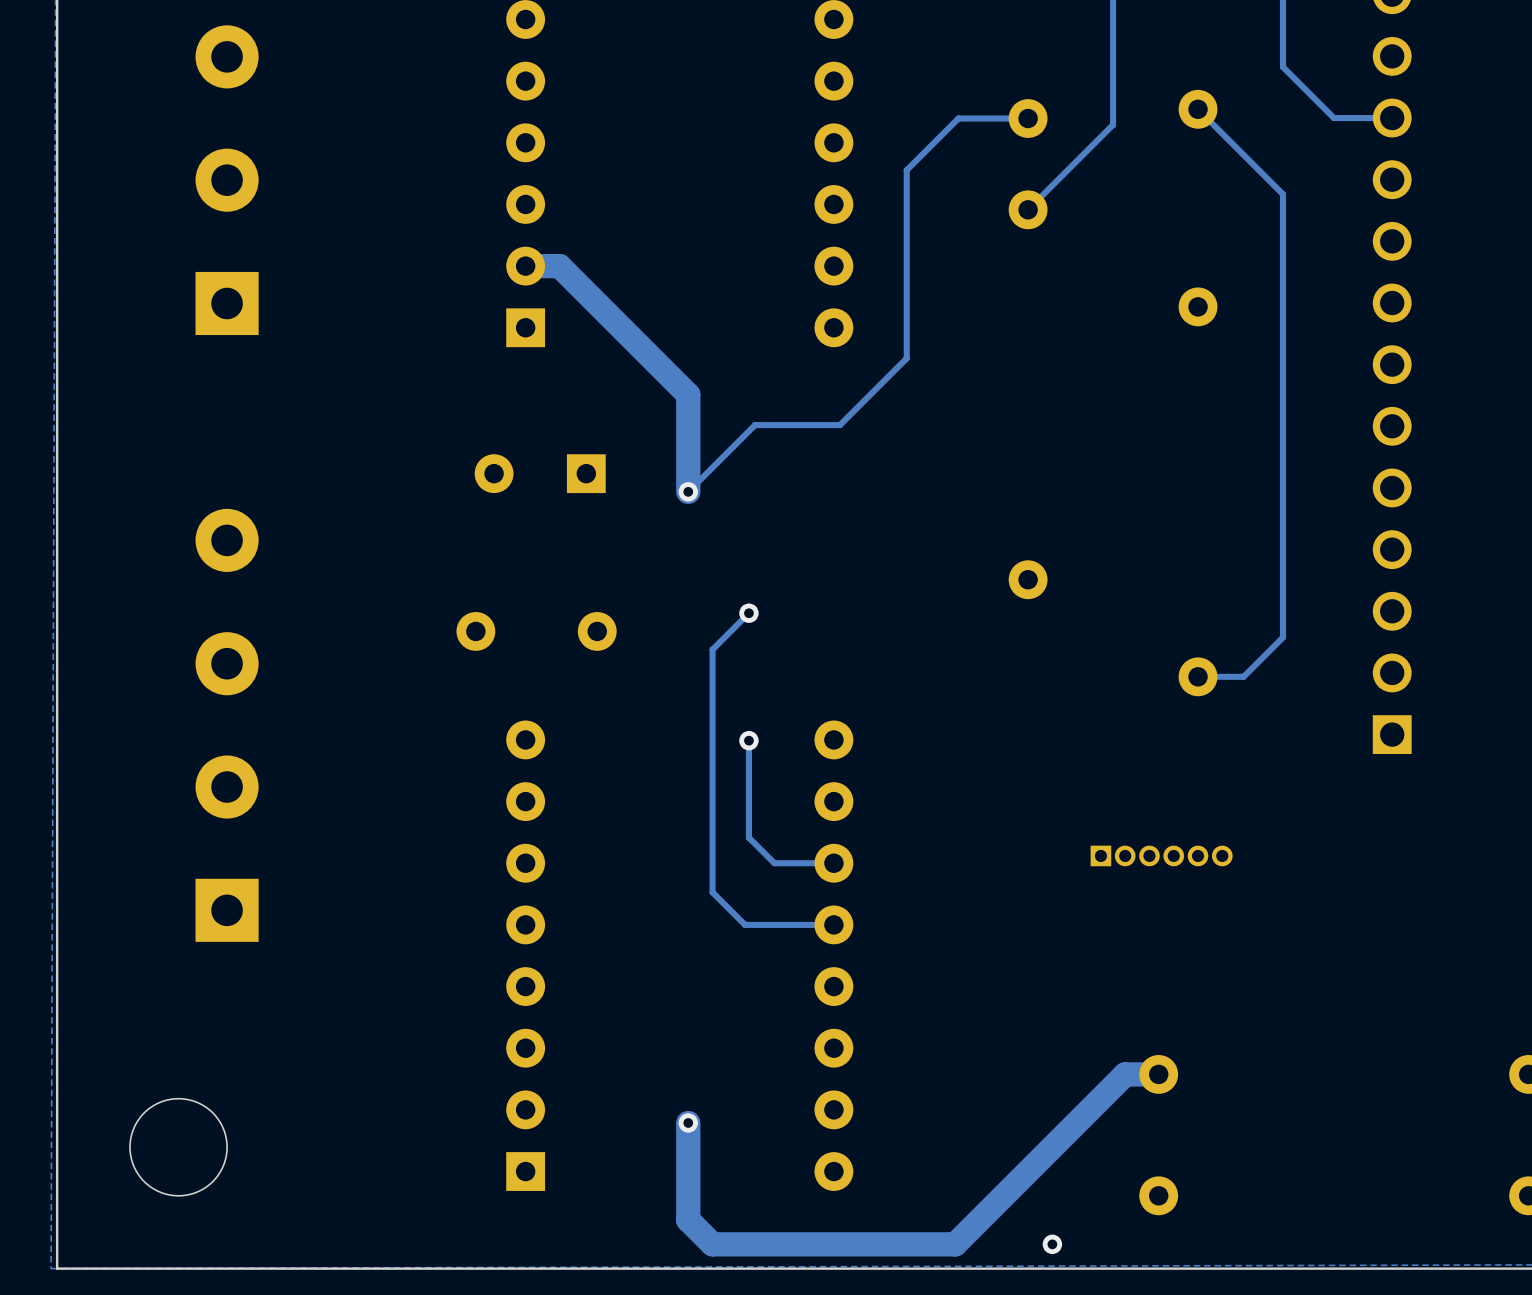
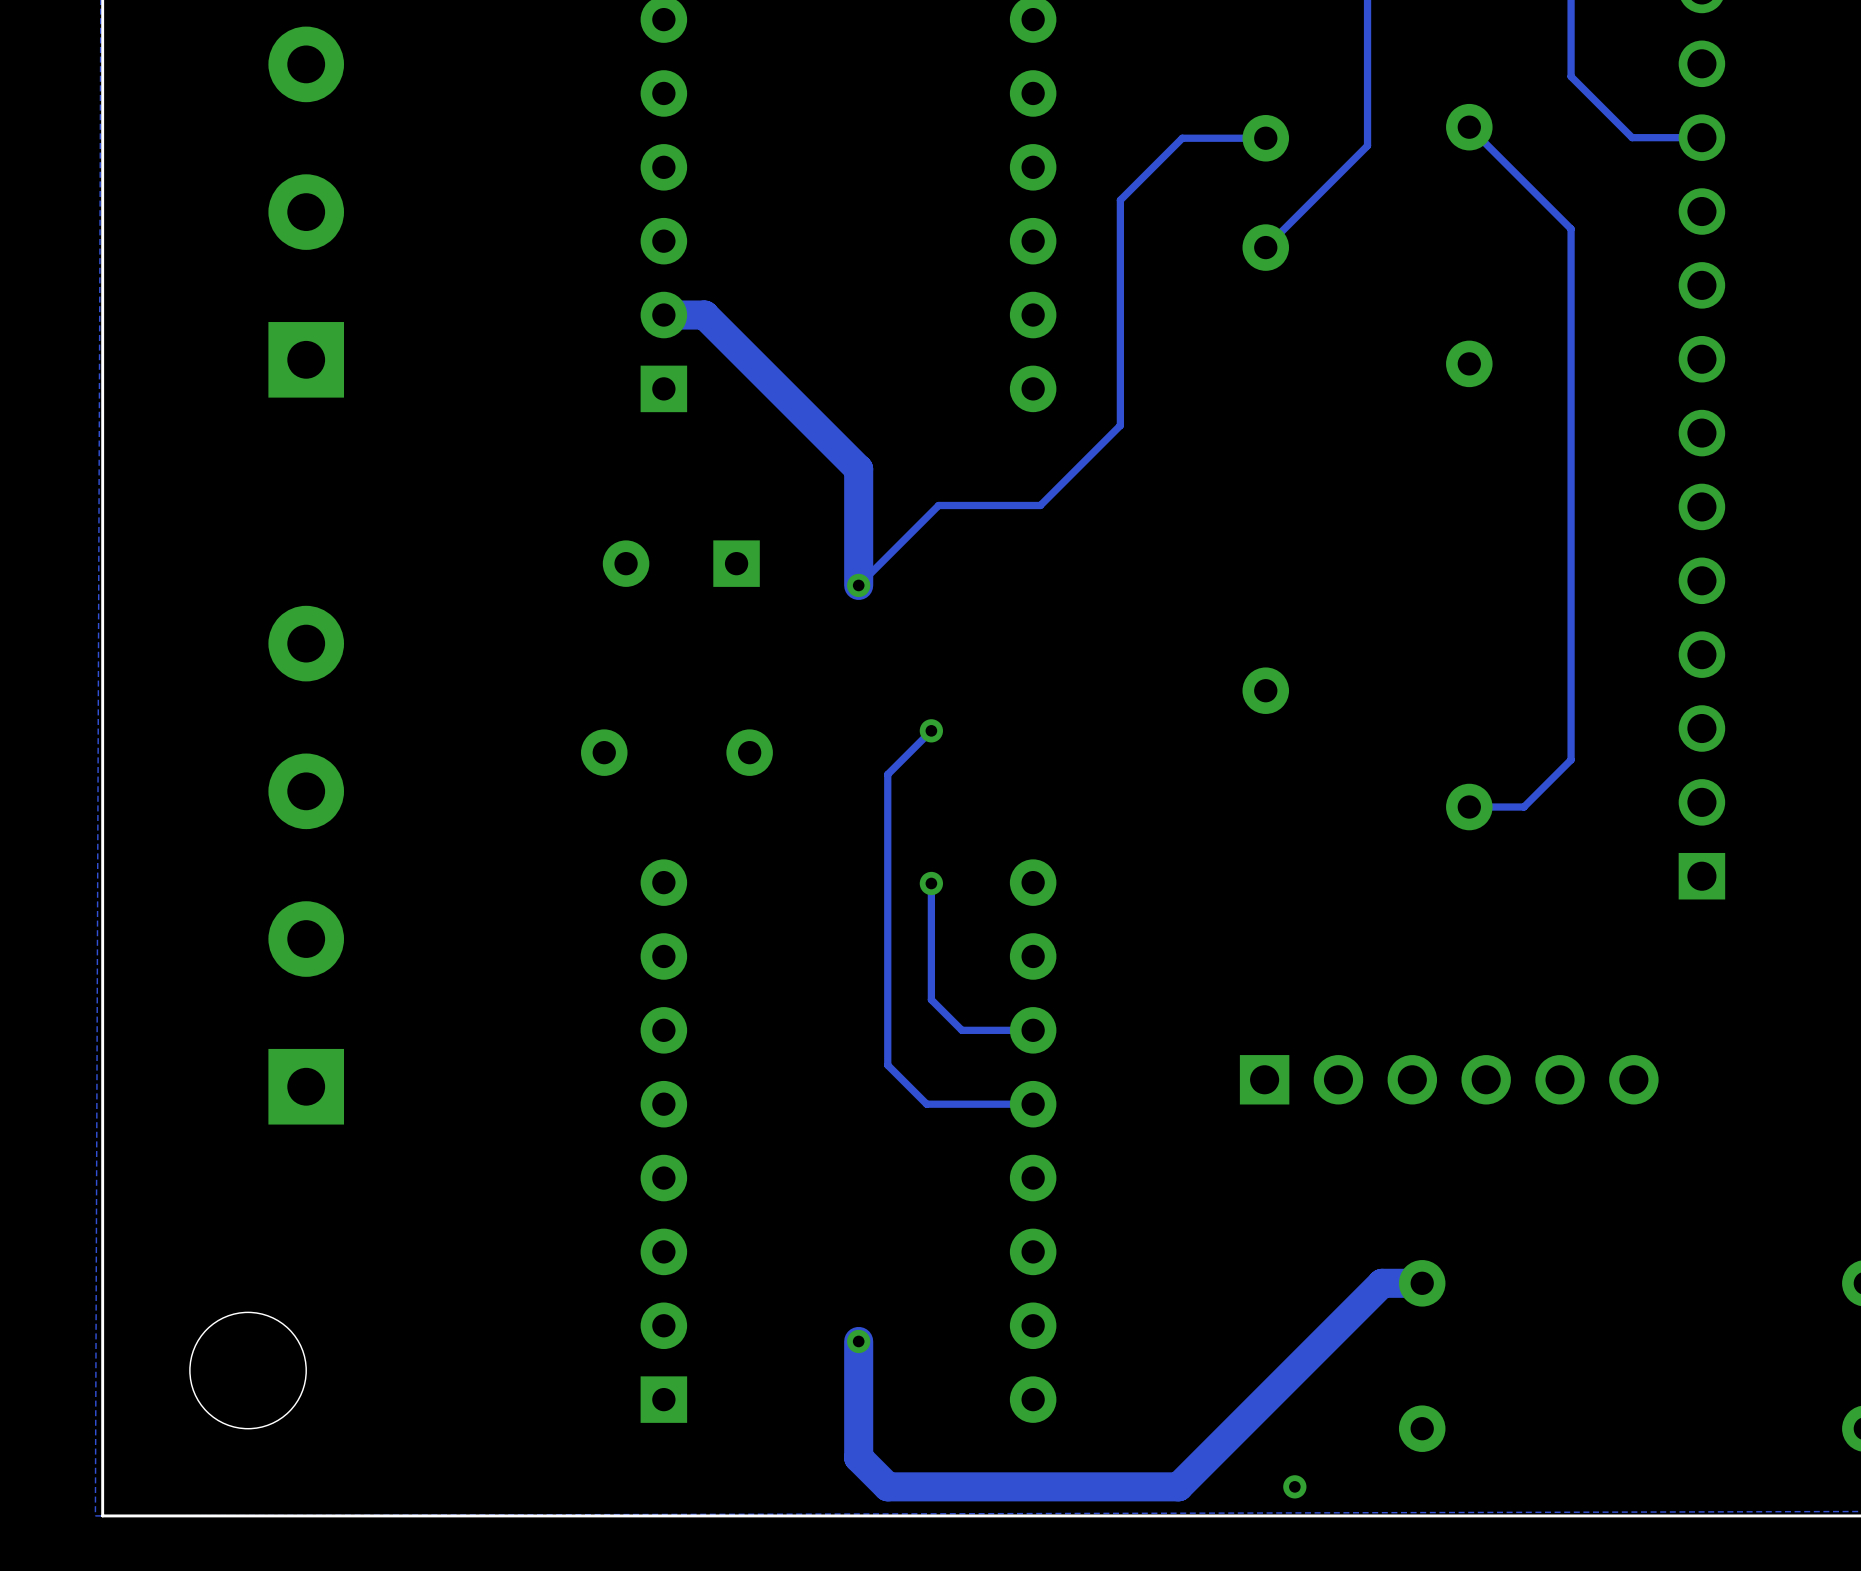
part: (1161, 855) -> none
part: none -> (1449, 1079)

